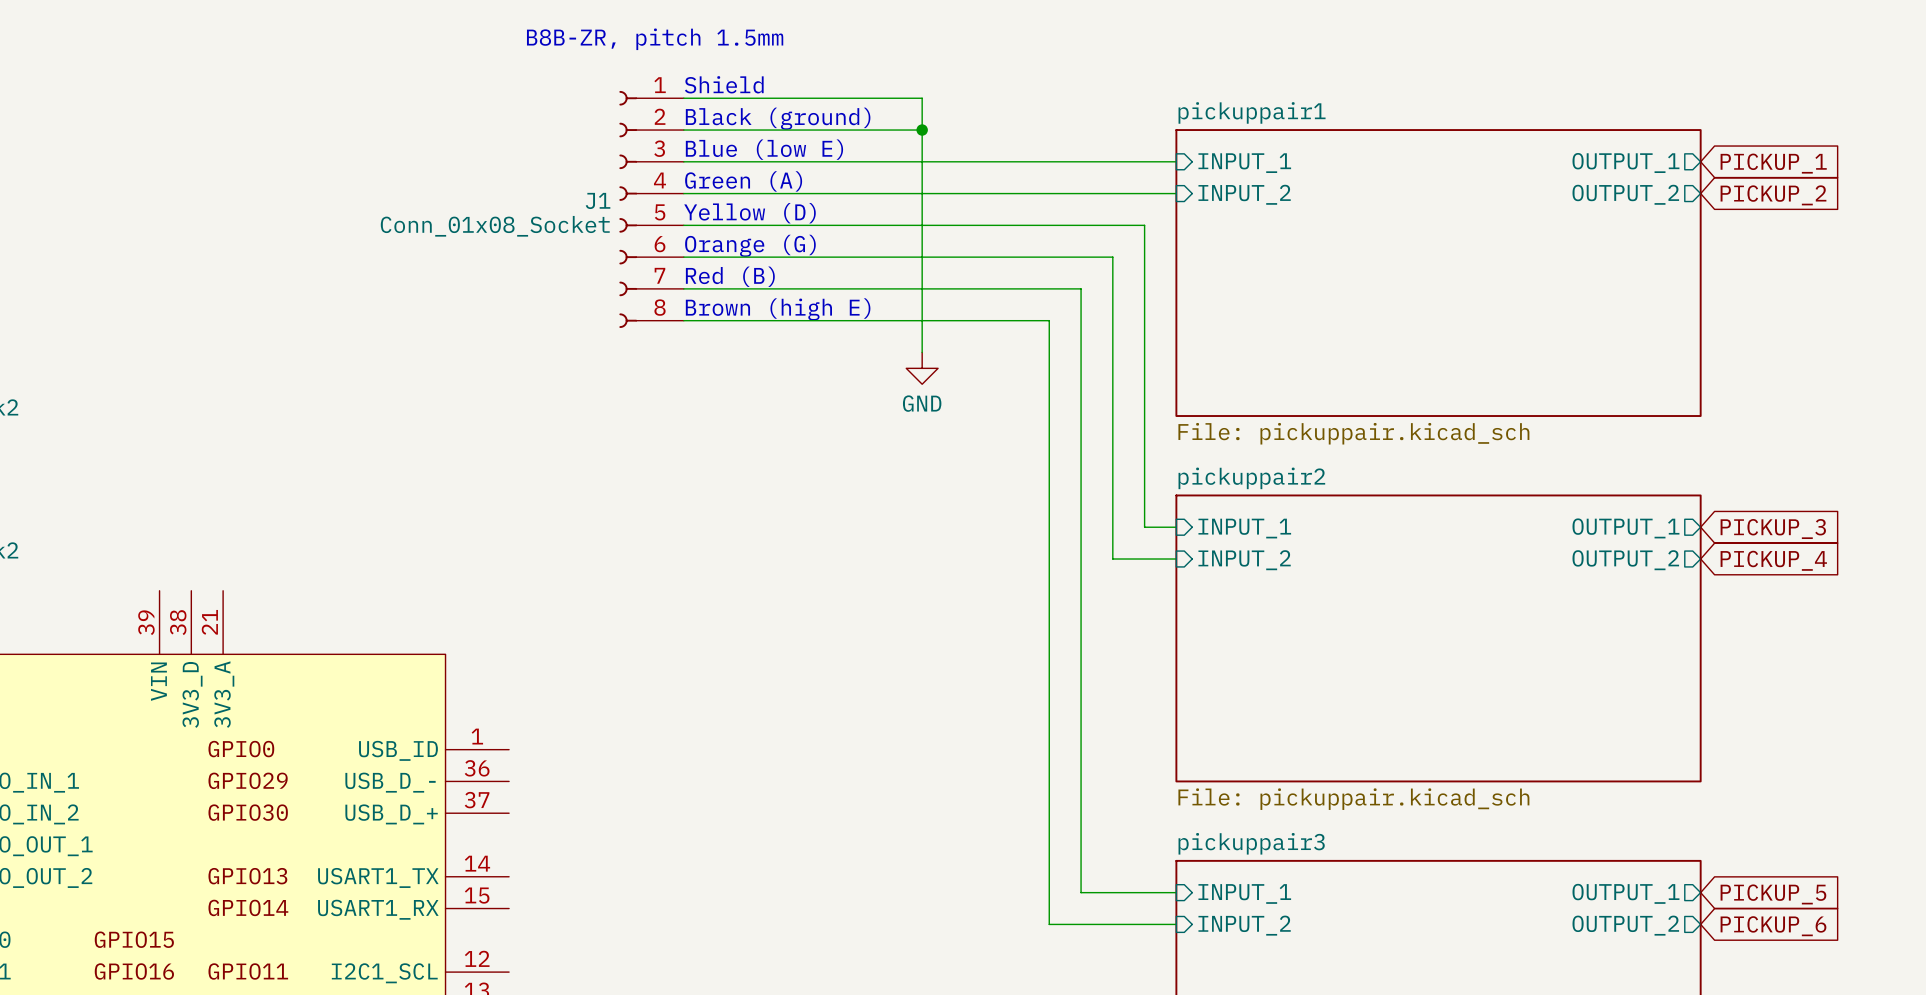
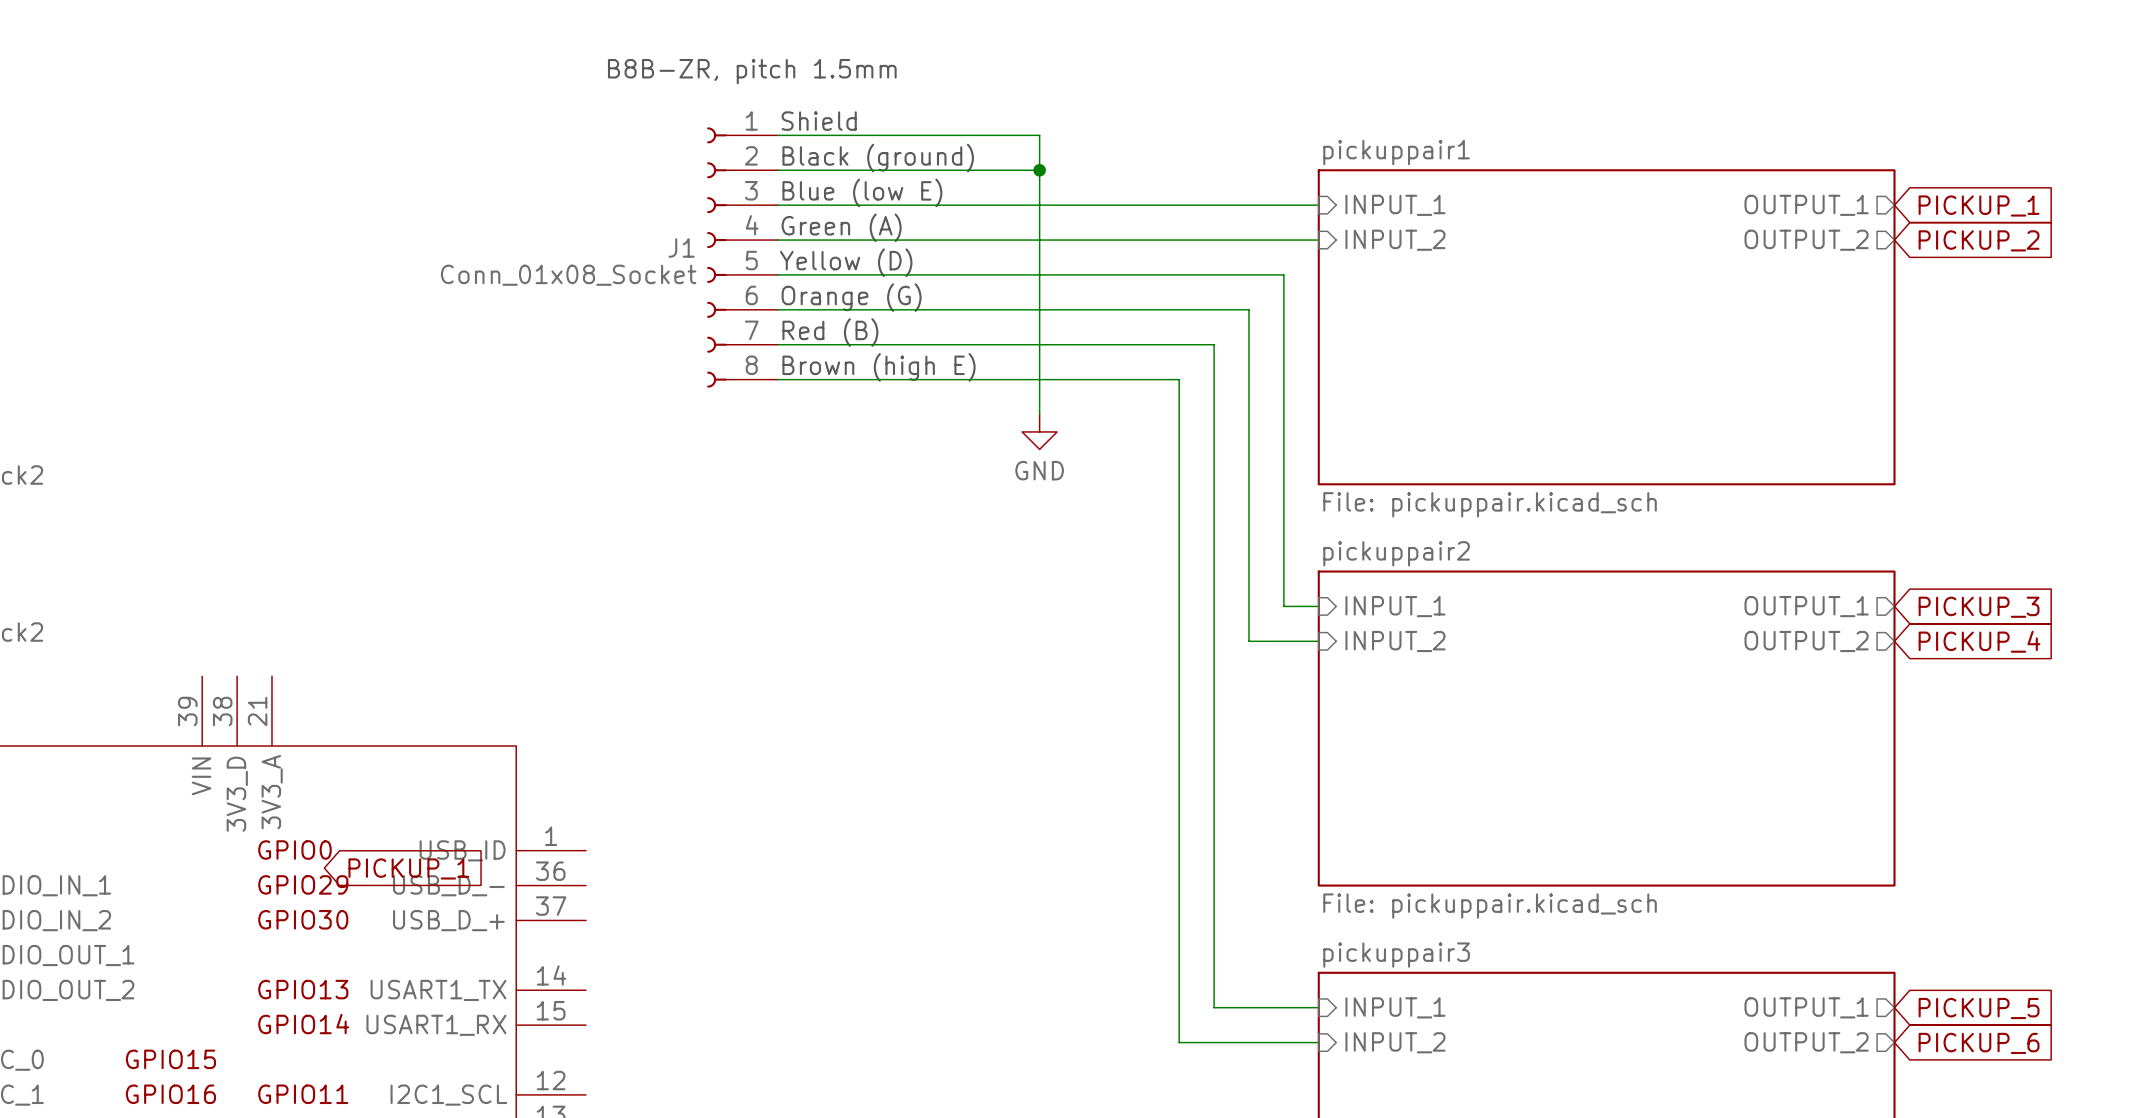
global label: none -> PICKUP_1 (408, 868)

